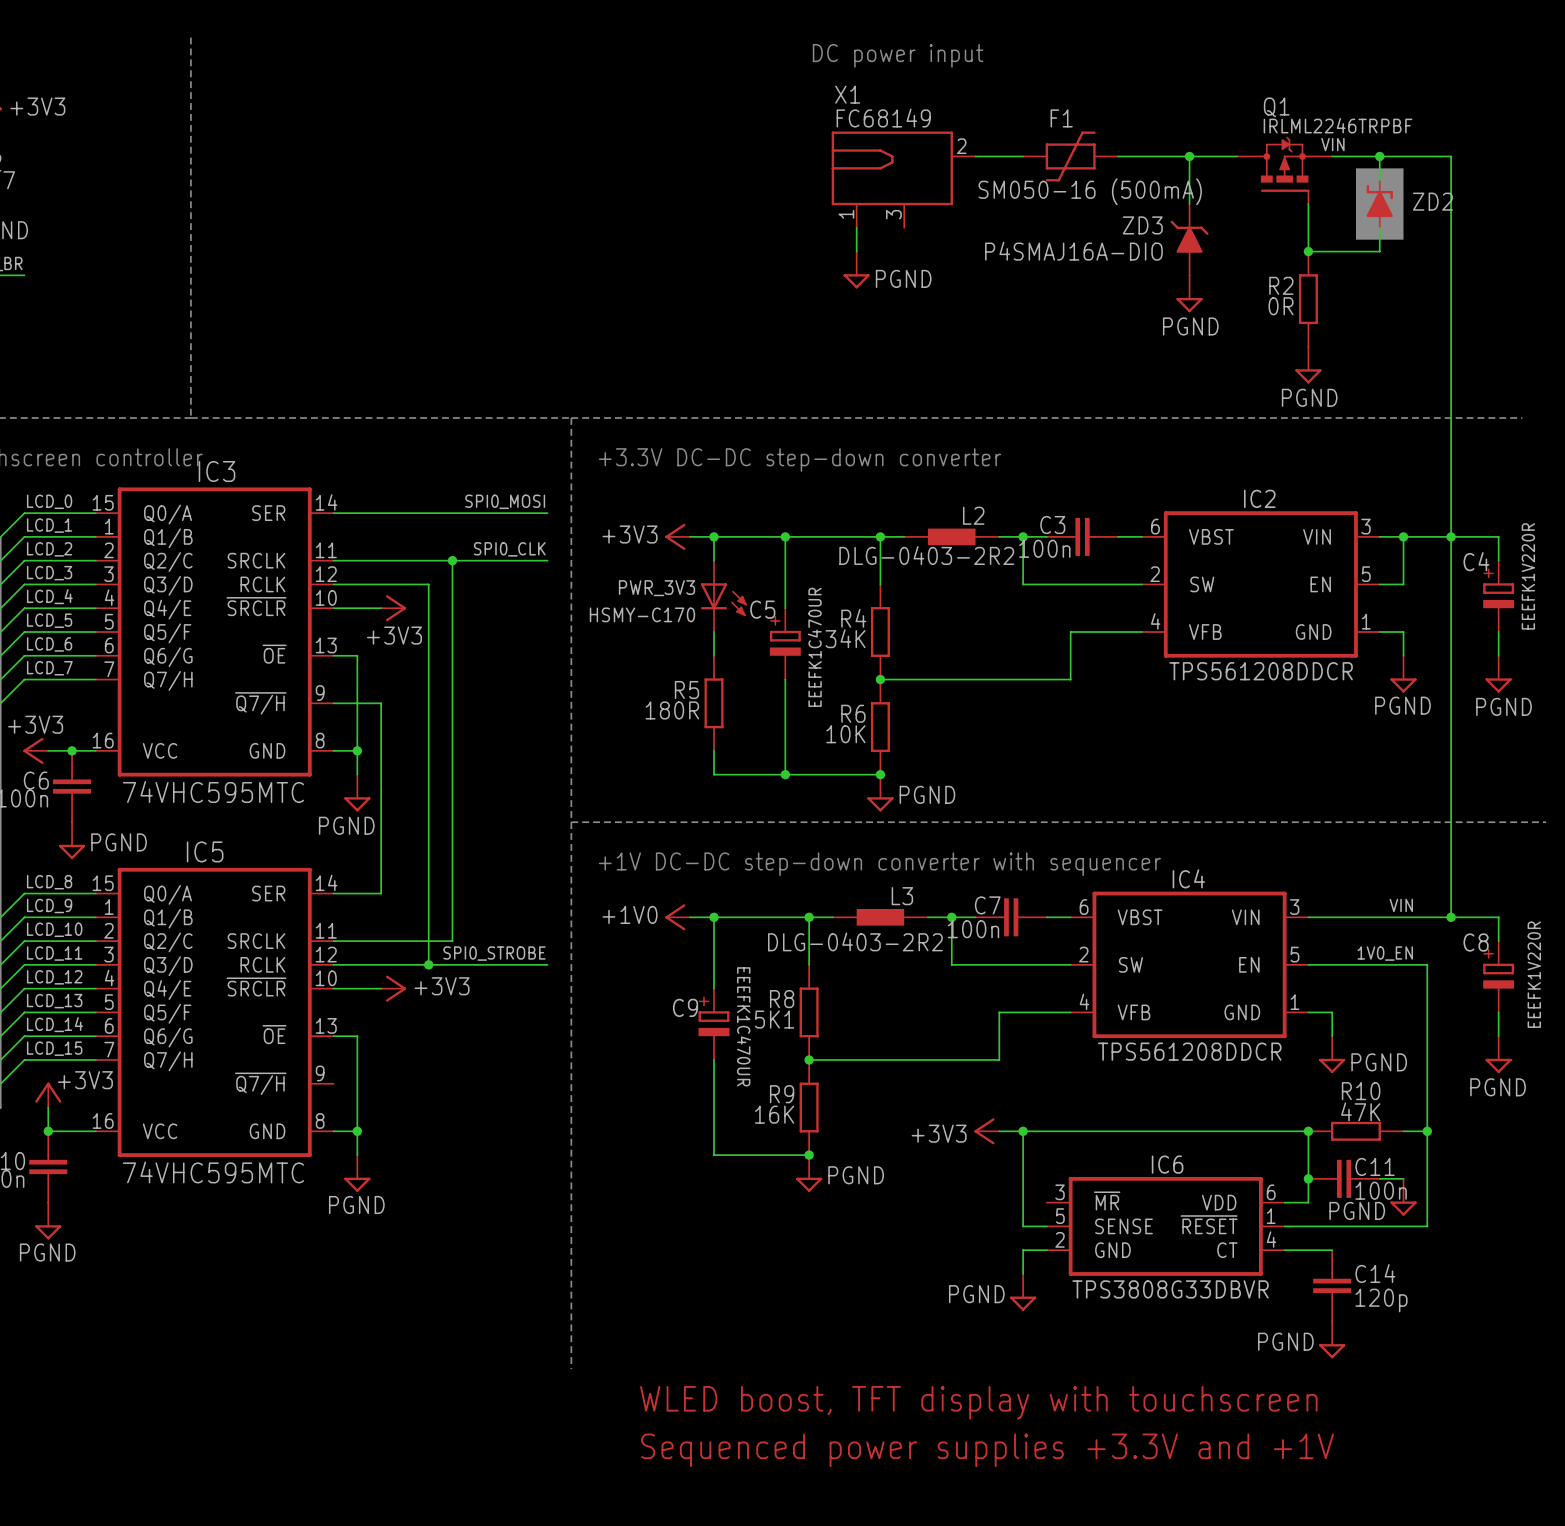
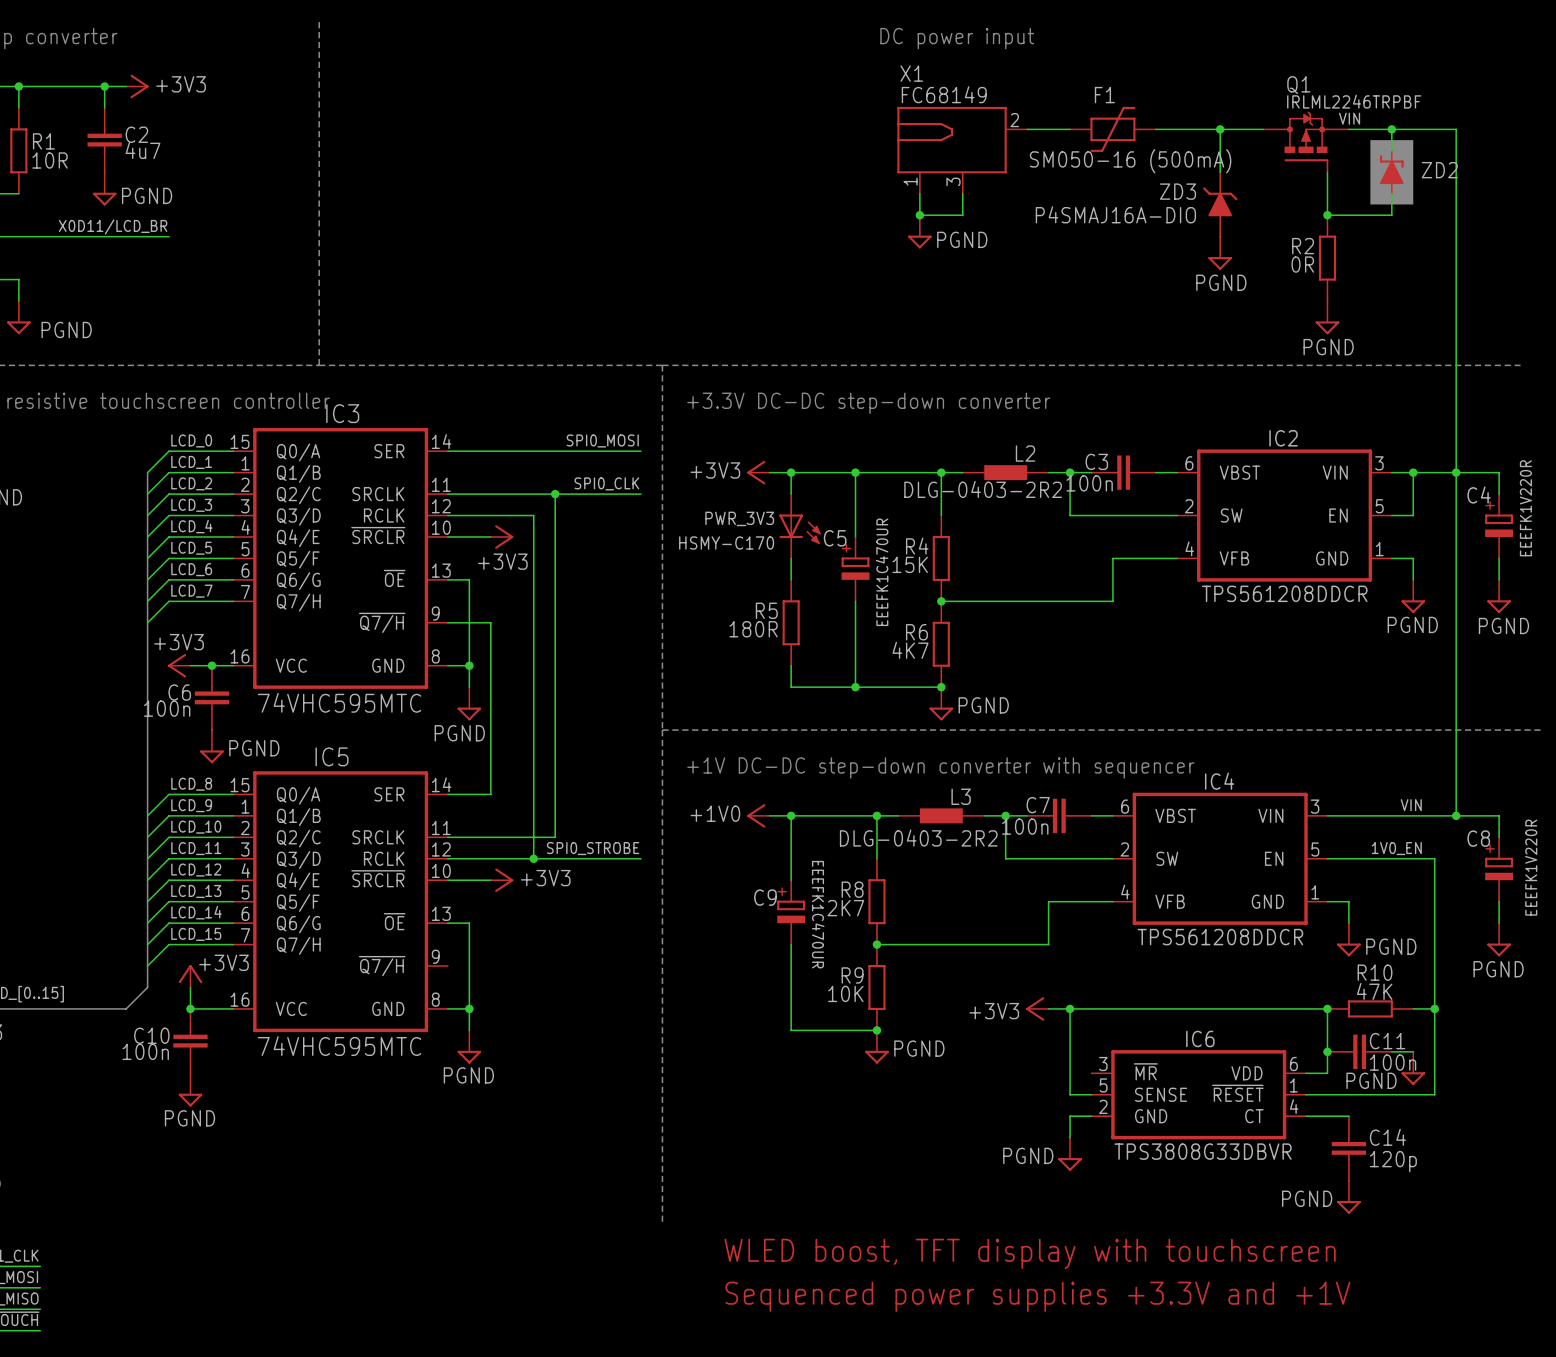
wire: none -> (962, 193) (962, 215) (919, 215)
junction: none -> (919, 215)
R4 value: 34K (845, 638) -> 15K (910, 564)
R6 value: 10K (845, 734) -> 4K7 (910, 650)
R8 value: 5K1 (774, 1019) -> 2K7 (845, 908)
R9 value: 16K (774, 1114) -> 10K (845, 993)

